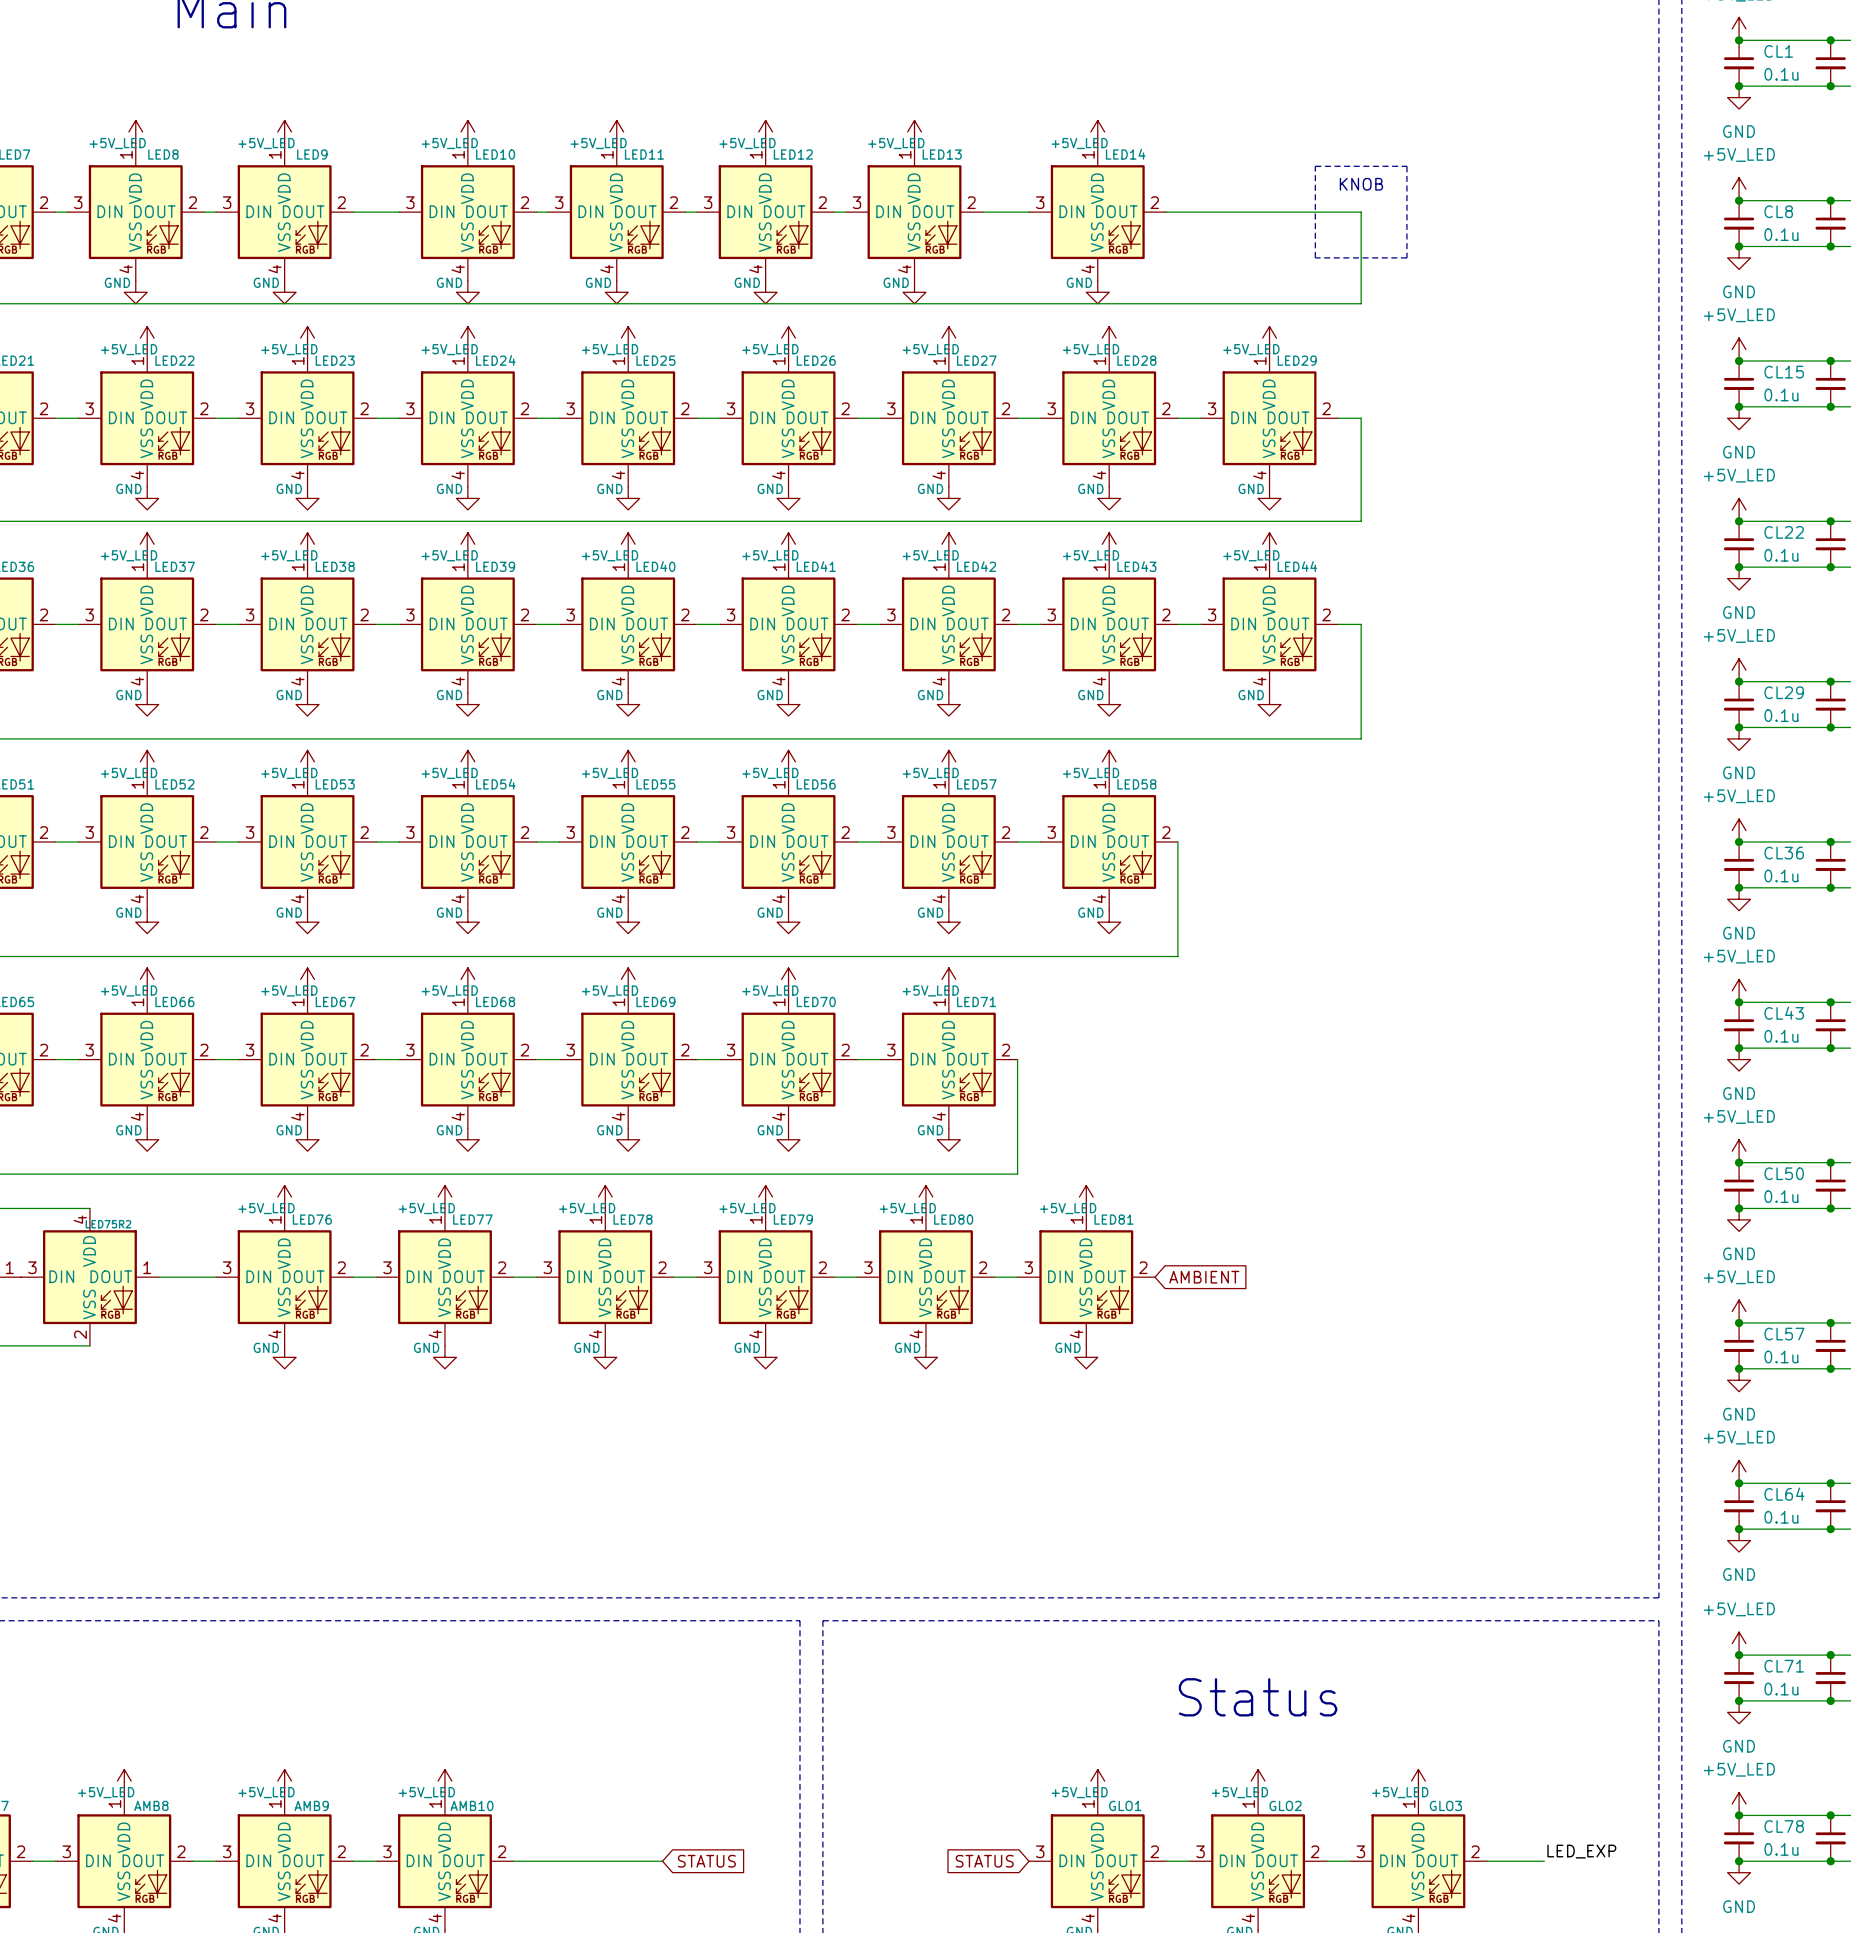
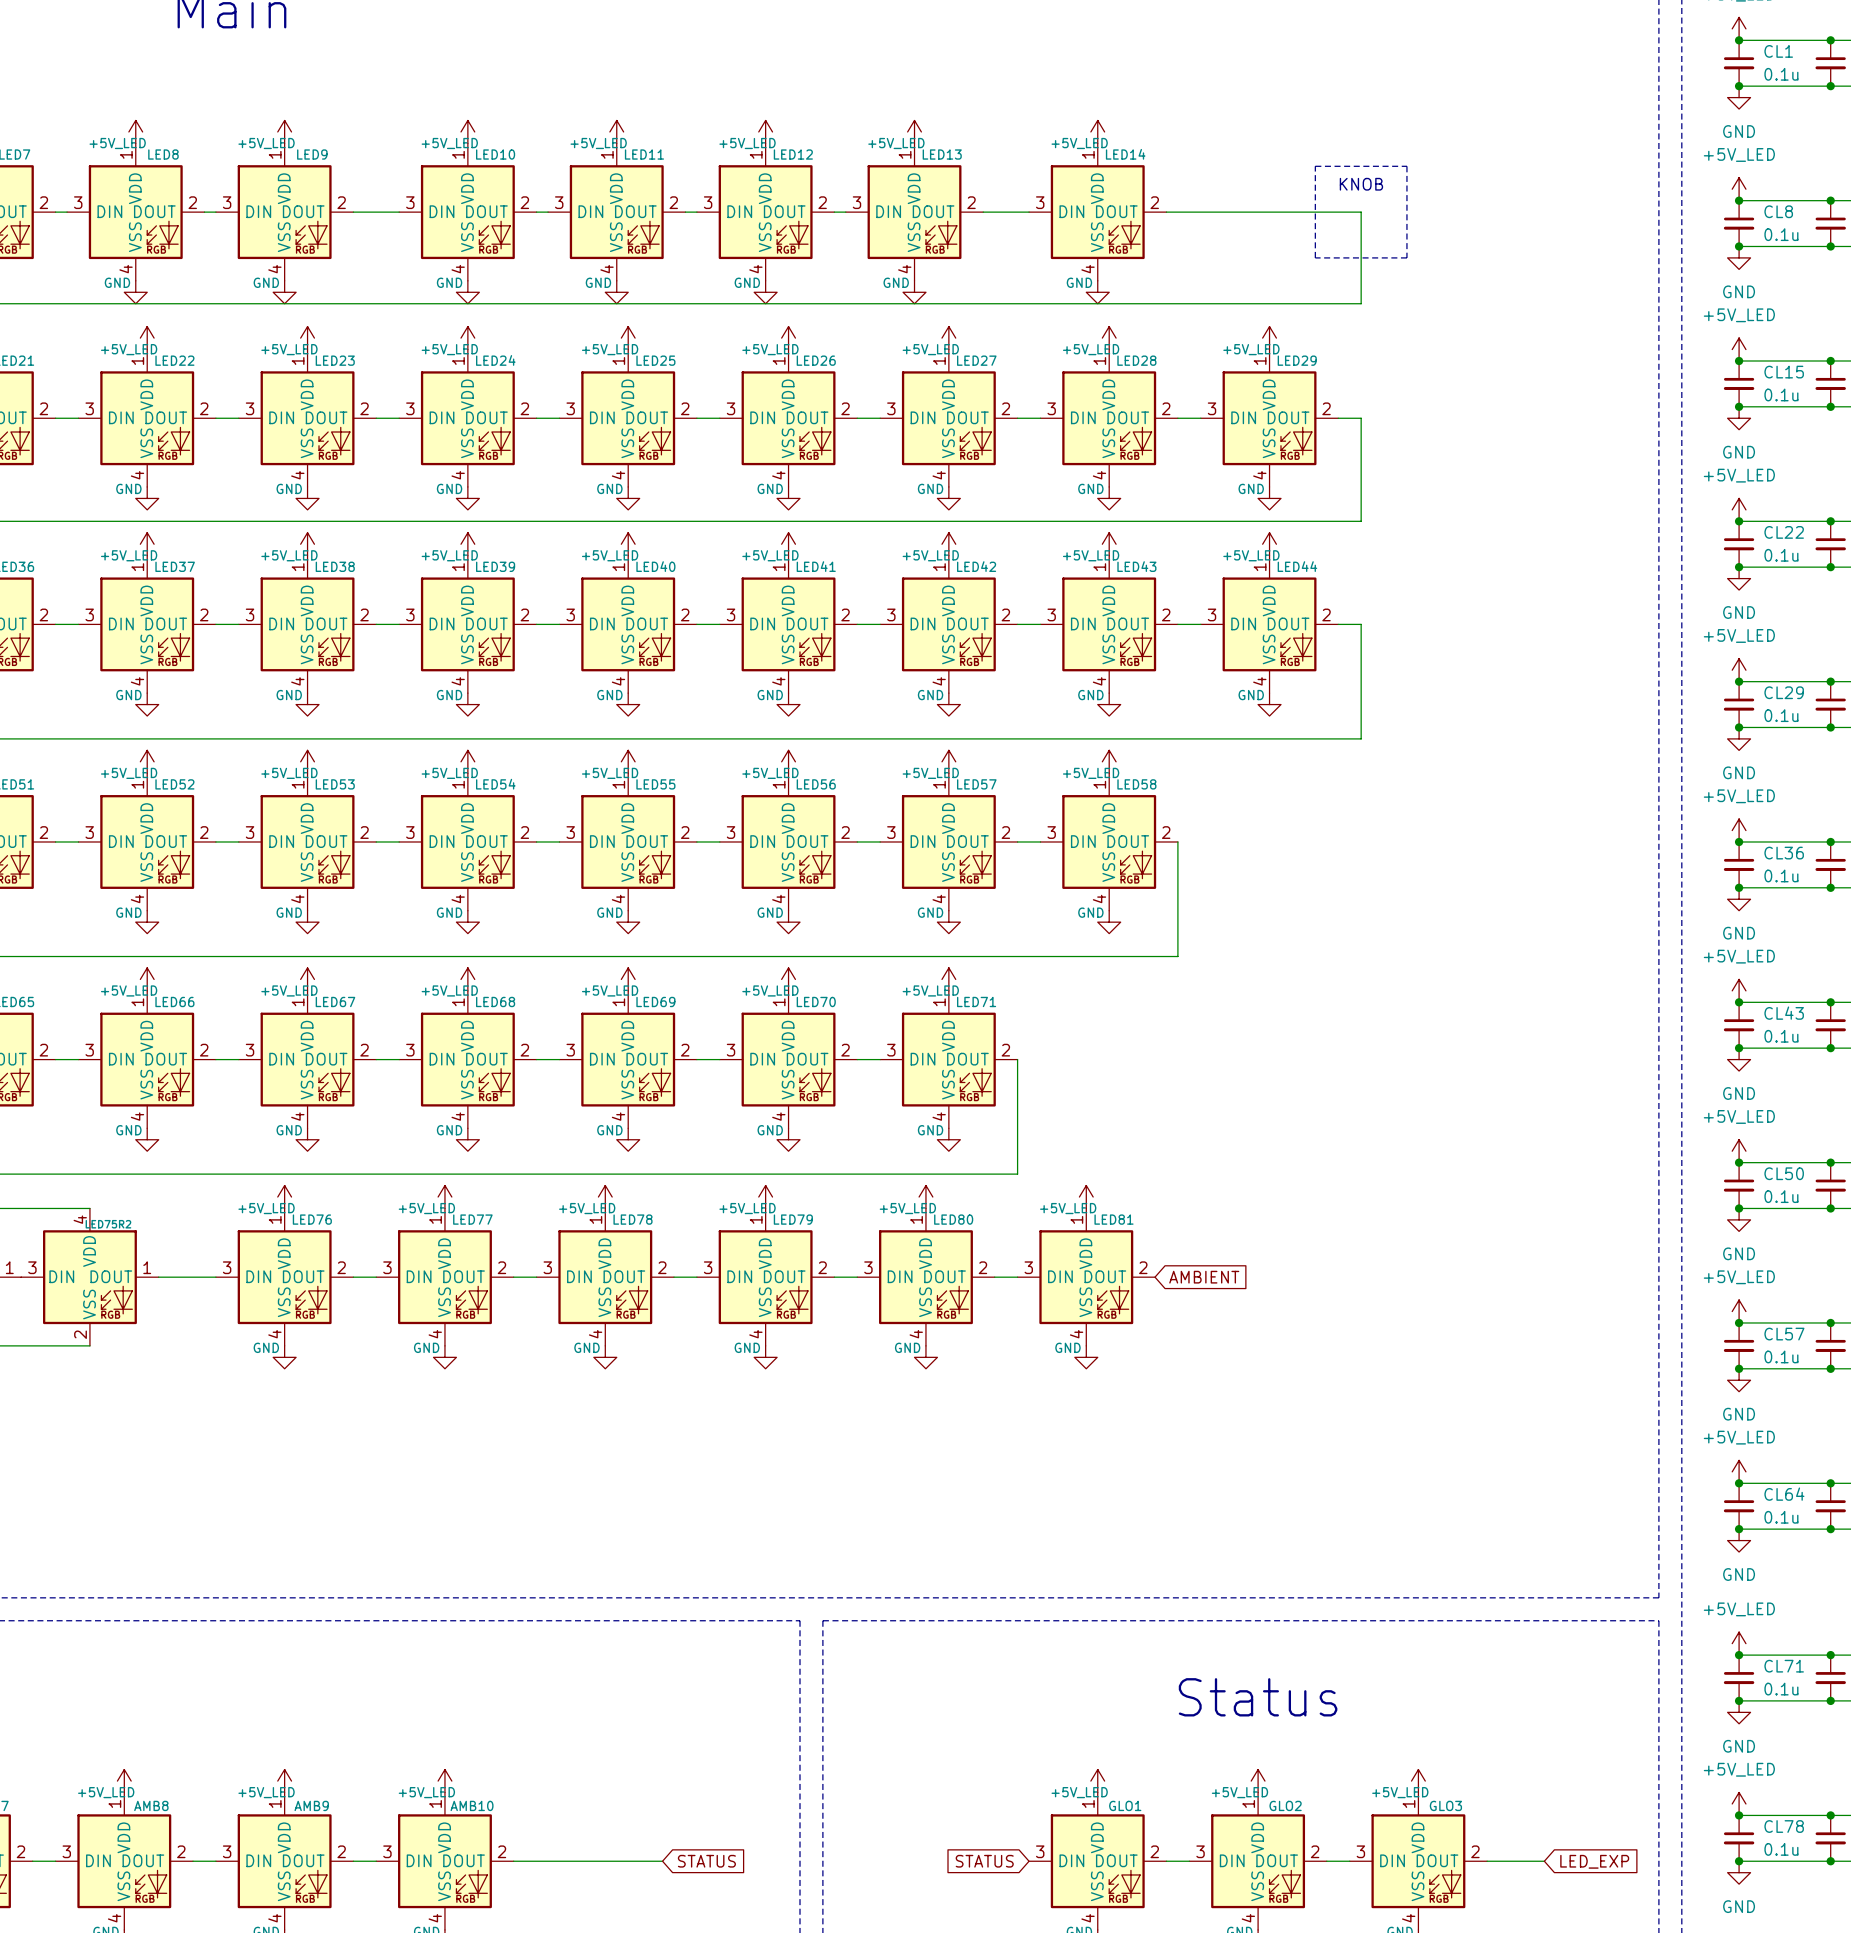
label: LED_EXP (1581, 1851) -> none
global label: none -> LED_EXP (1594, 1861)

